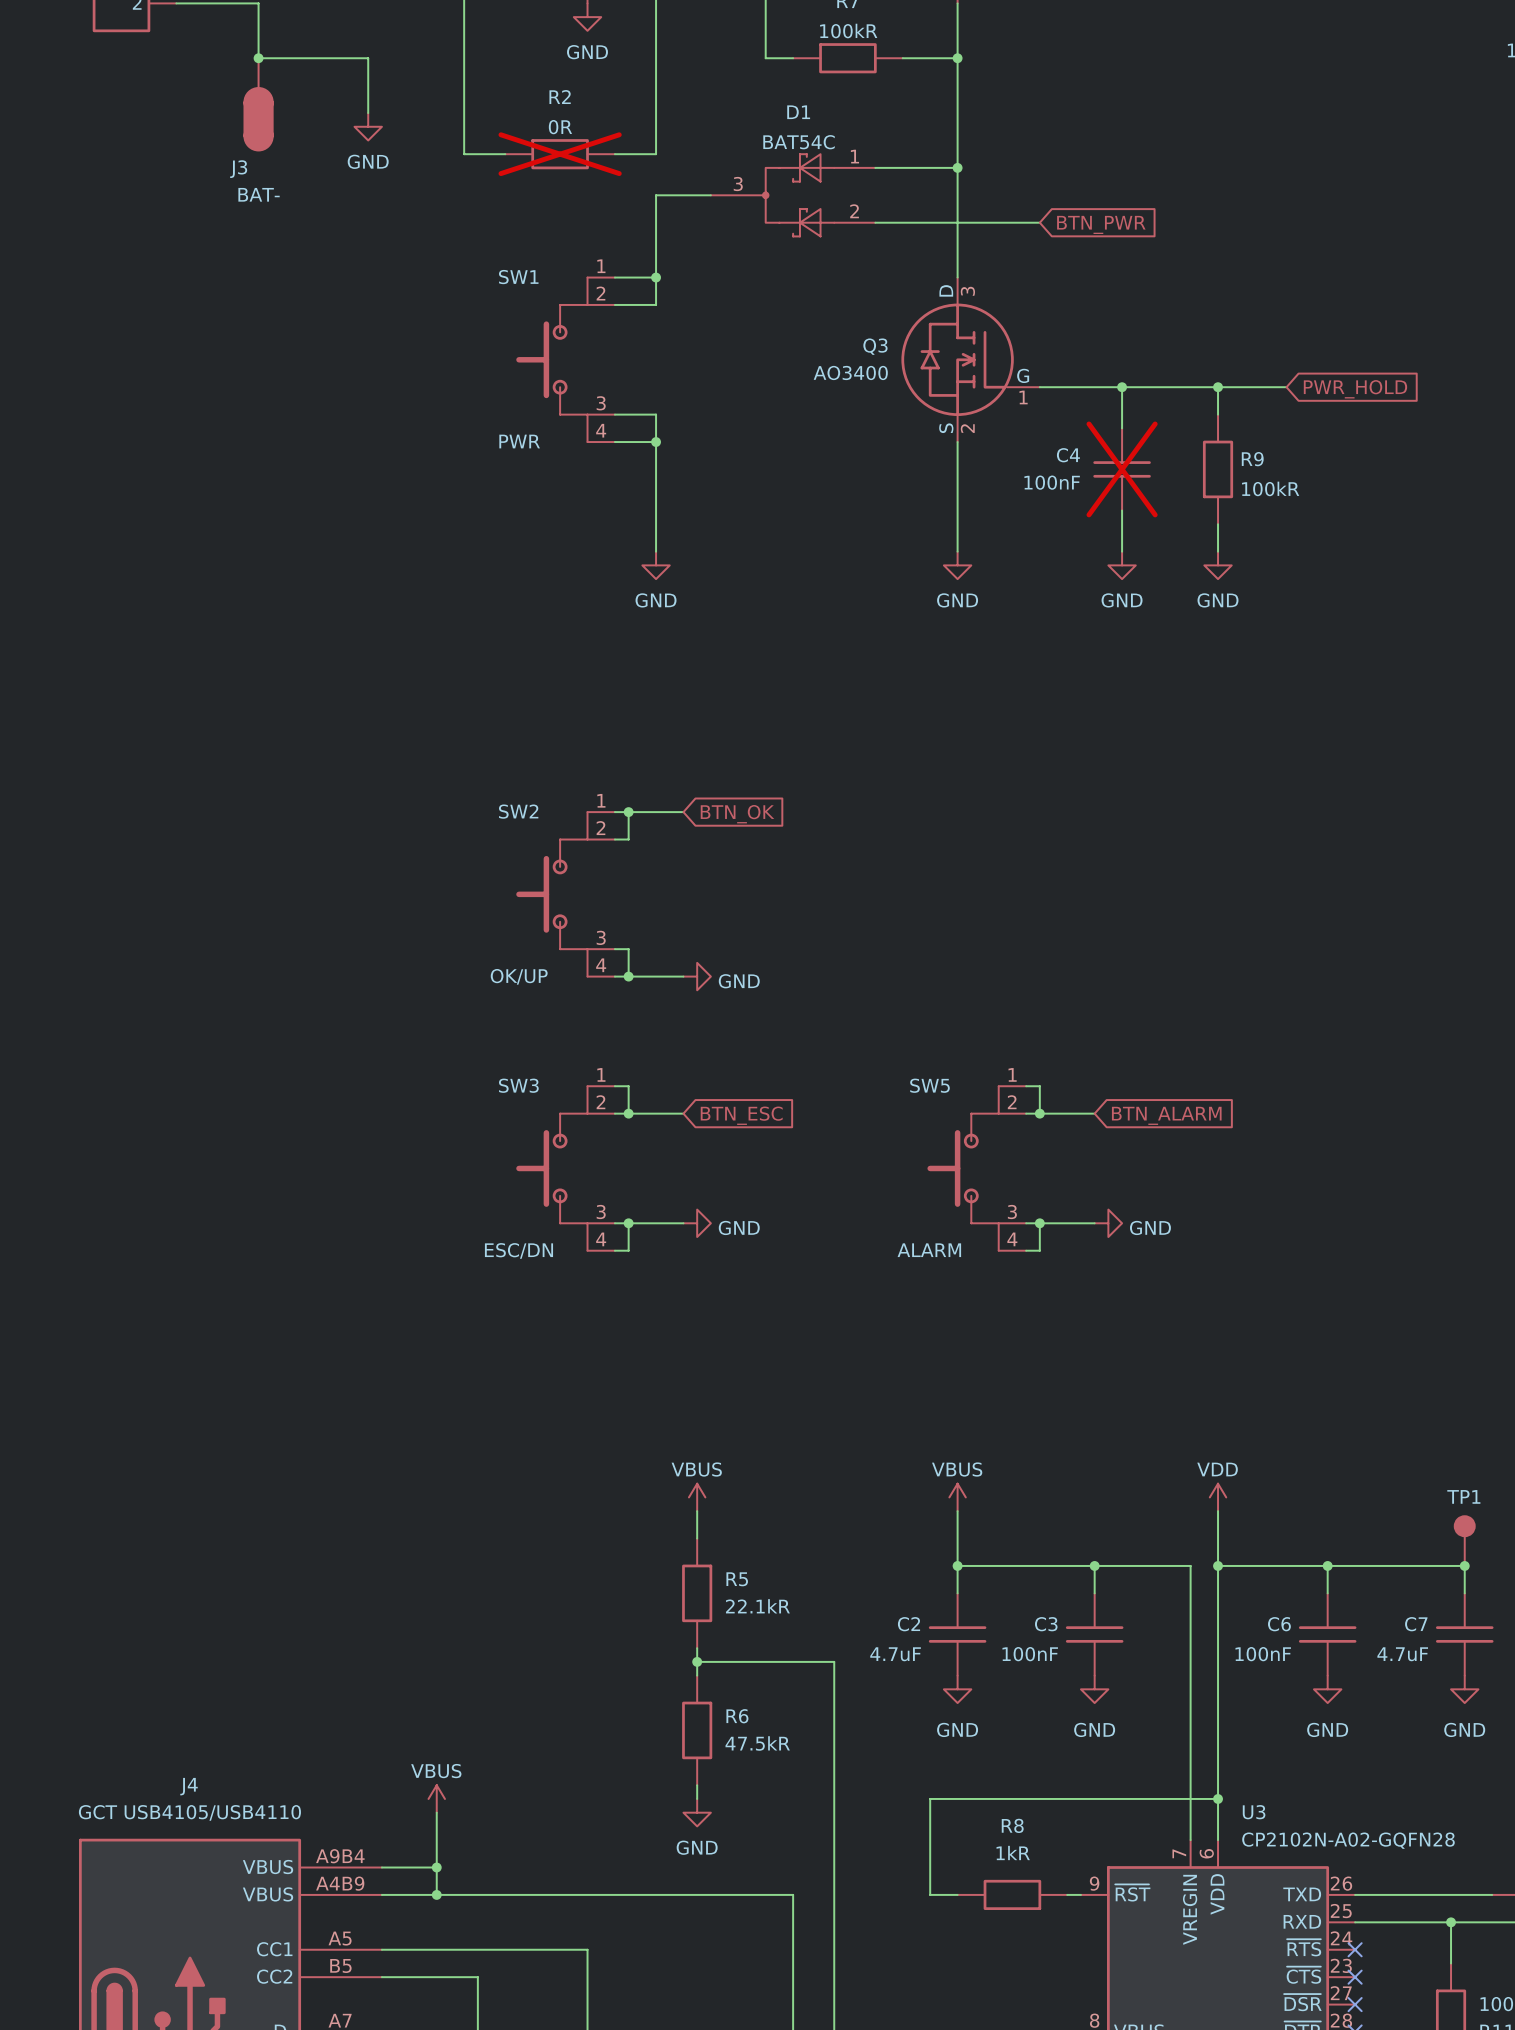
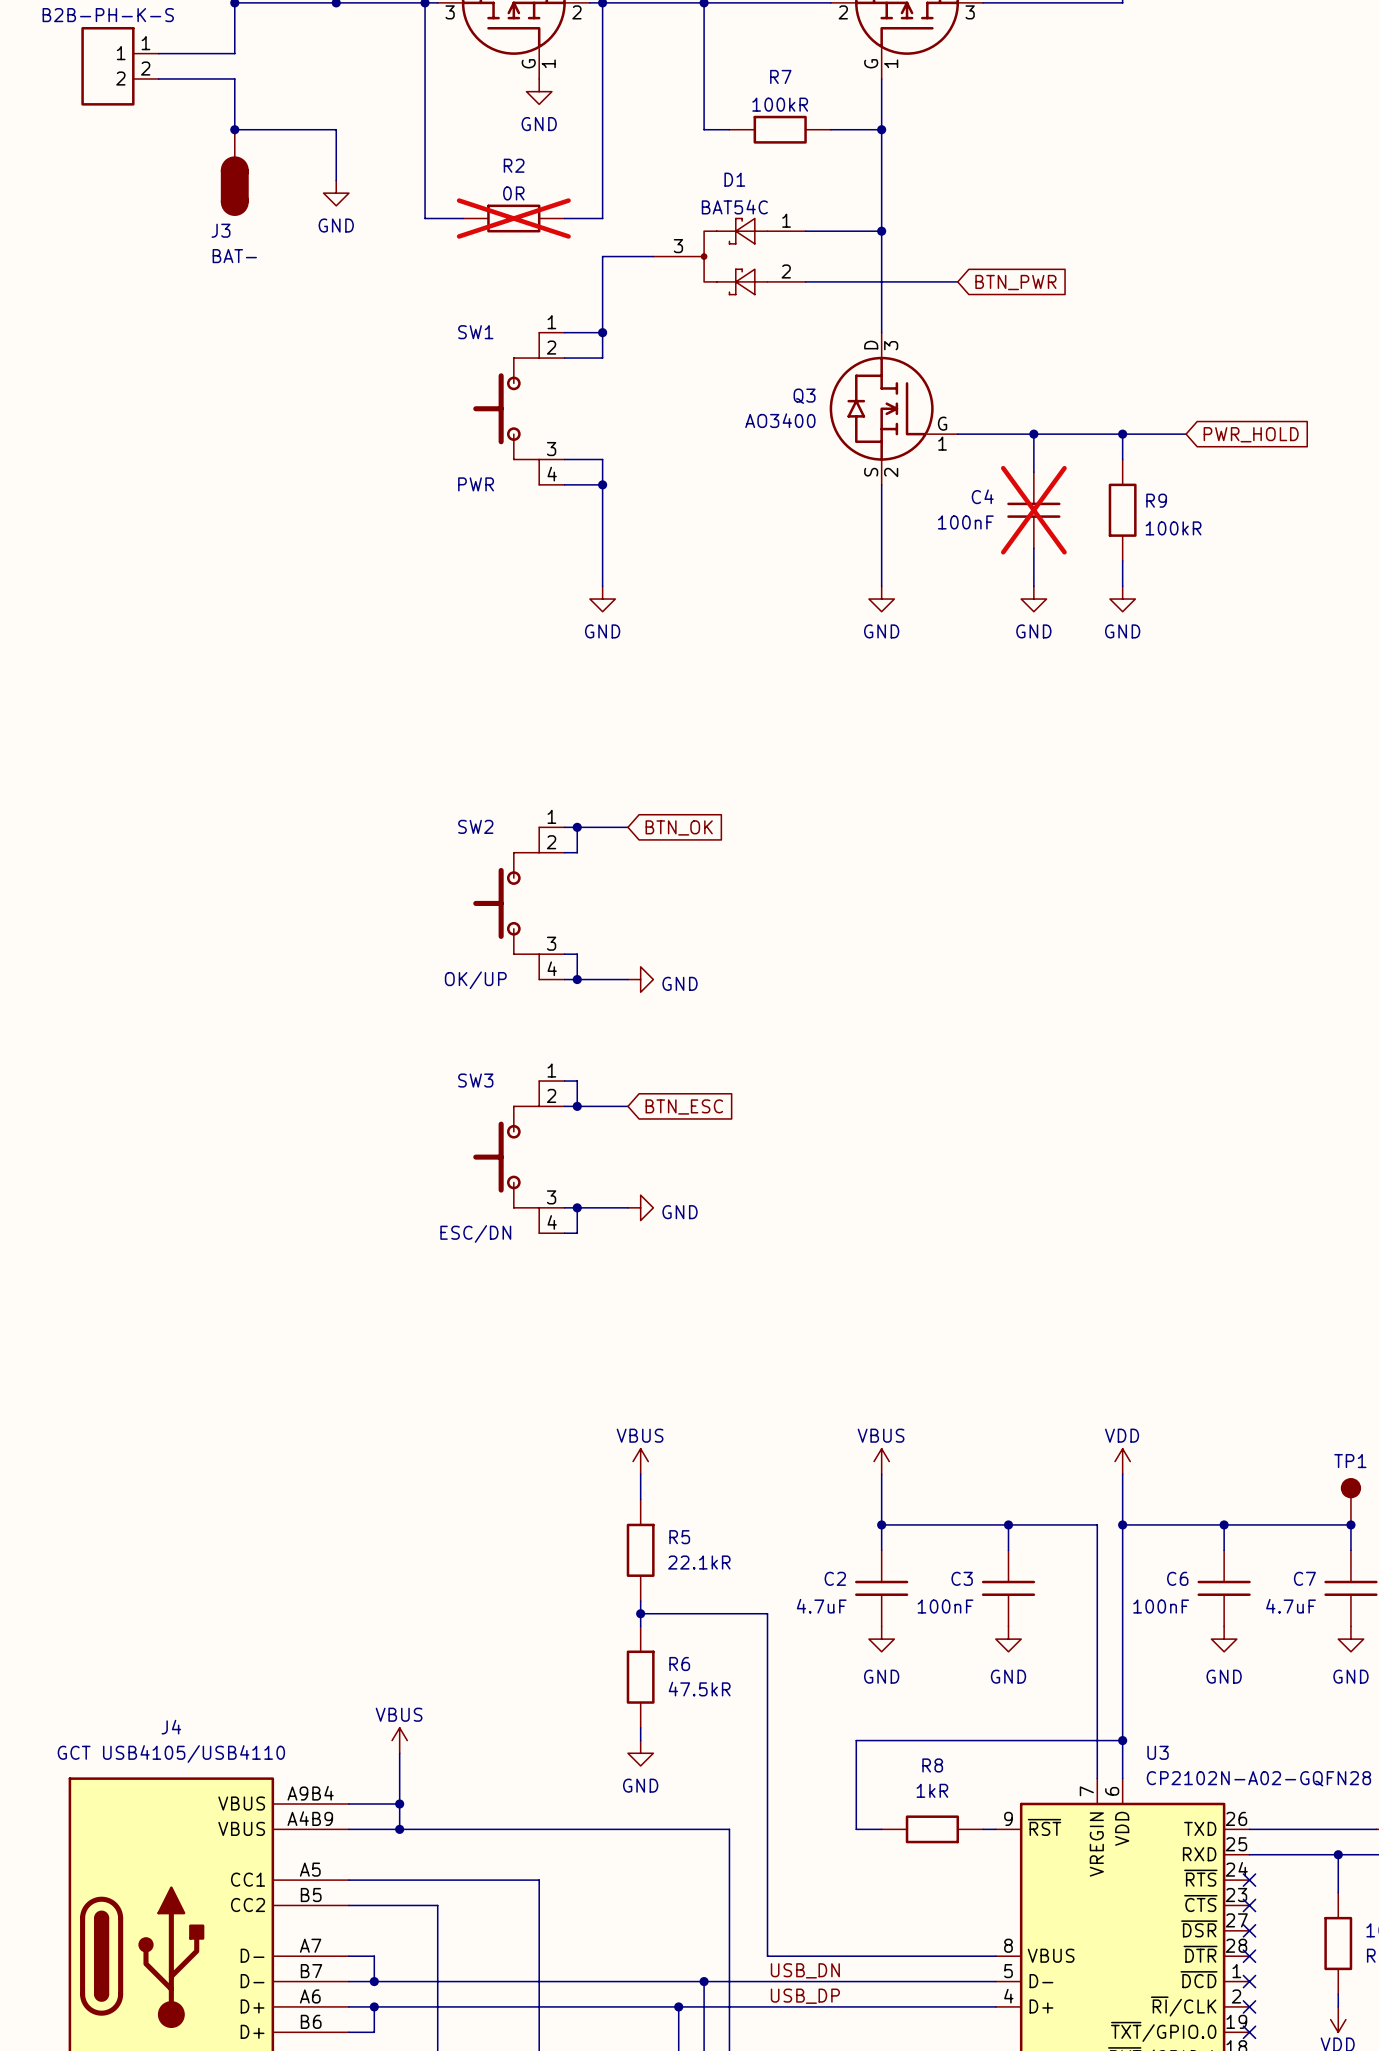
wire: (1026, 1086) (1039, 1086) (1039, 1113) -> none
wire: (1026, 1113) (1094, 1113) -> none
junction: (1039, 1113) -> none
global label: BTN_ALARM (1166, 1115) -> none
SW5: (976, 1168) -> none
wire: (1026, 1223) (1094, 1223) -> none
wire: (1039, 1223) (1039, 1250) (1026, 1250) -> none
junction: (1039, 1223) -> none
power symbol: GND (1108, 1223) -> none

